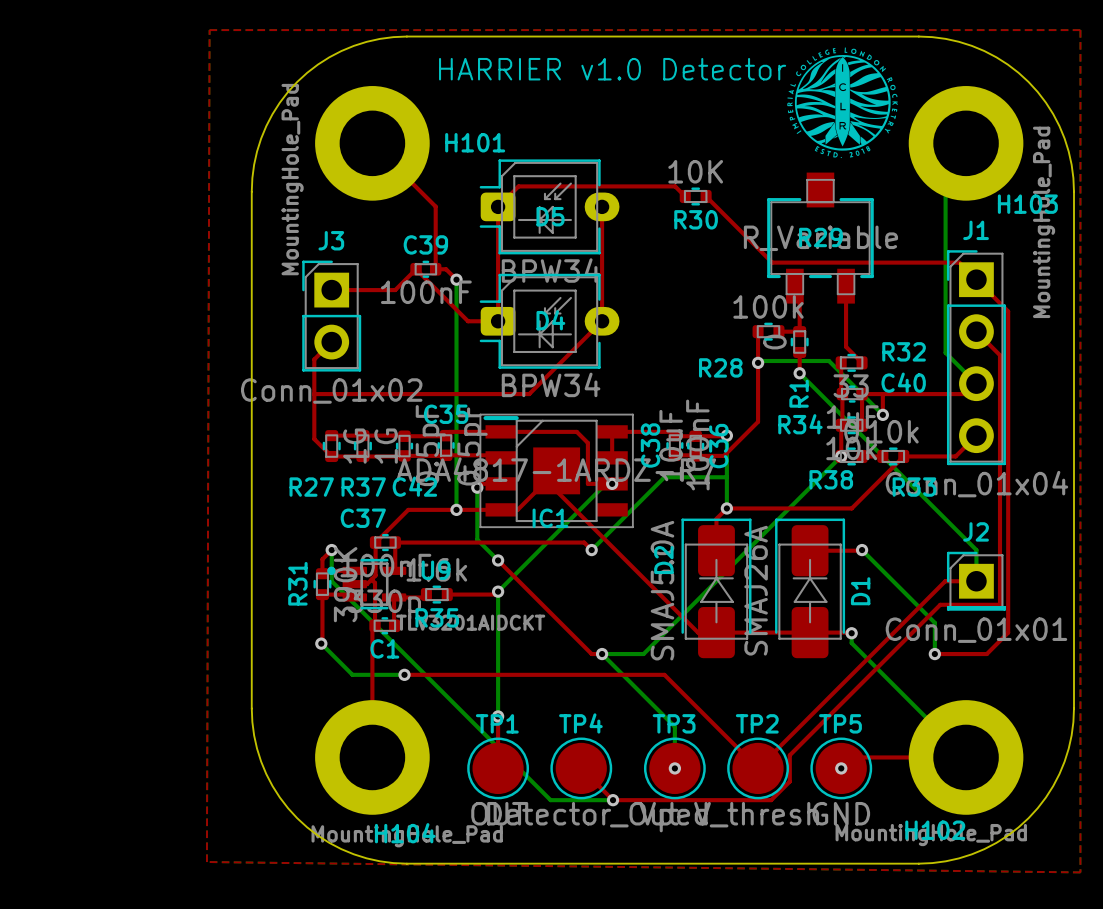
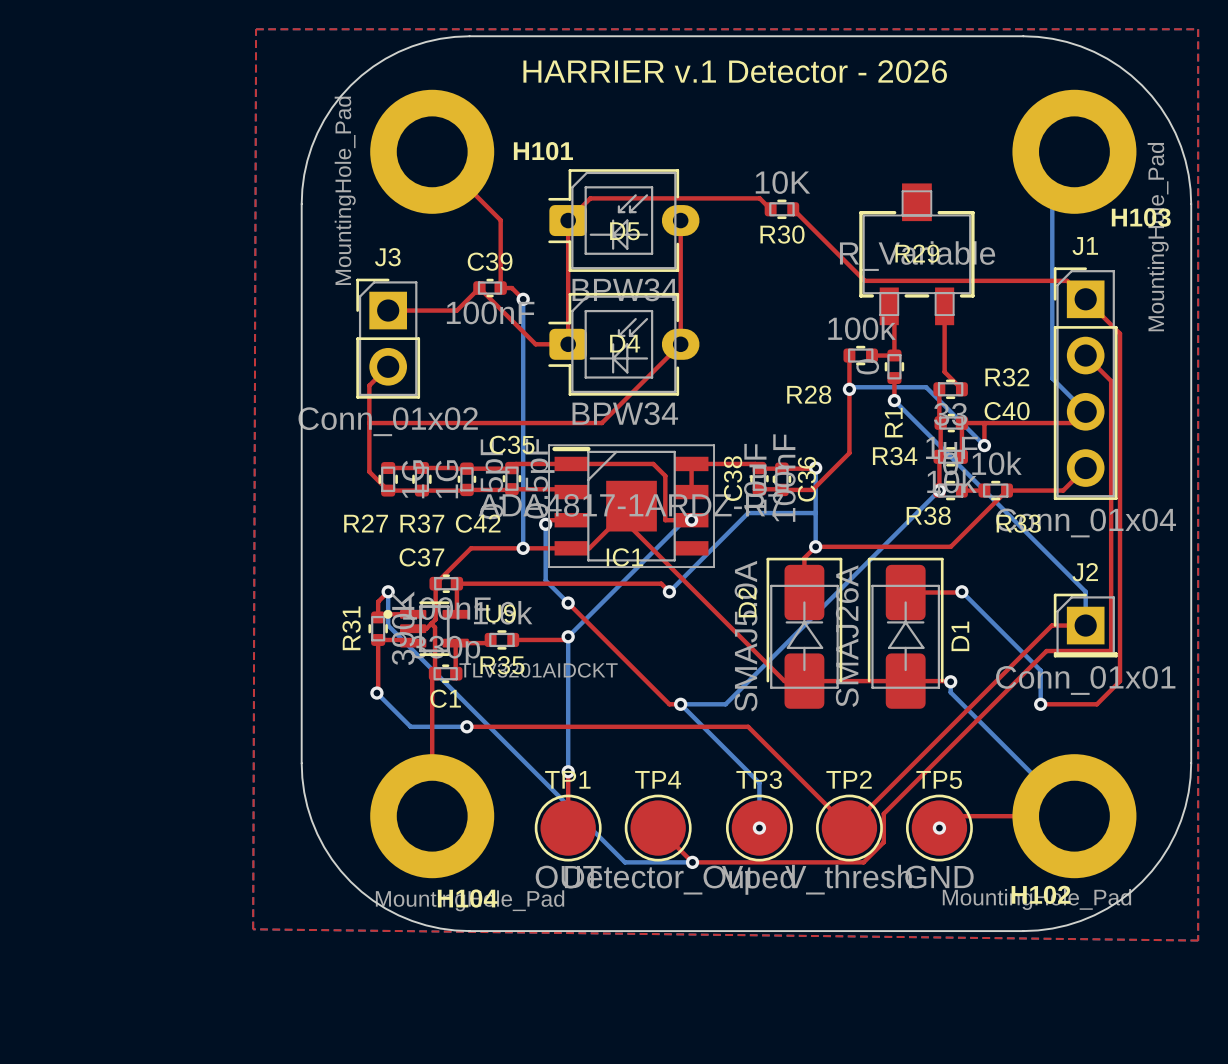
drawing: [787, 47, 898, 159] -> none
text: HARRIER v1.0 Detector (612, 69) -> HARRIER v.1 Detector - 2026 (735, 71)

